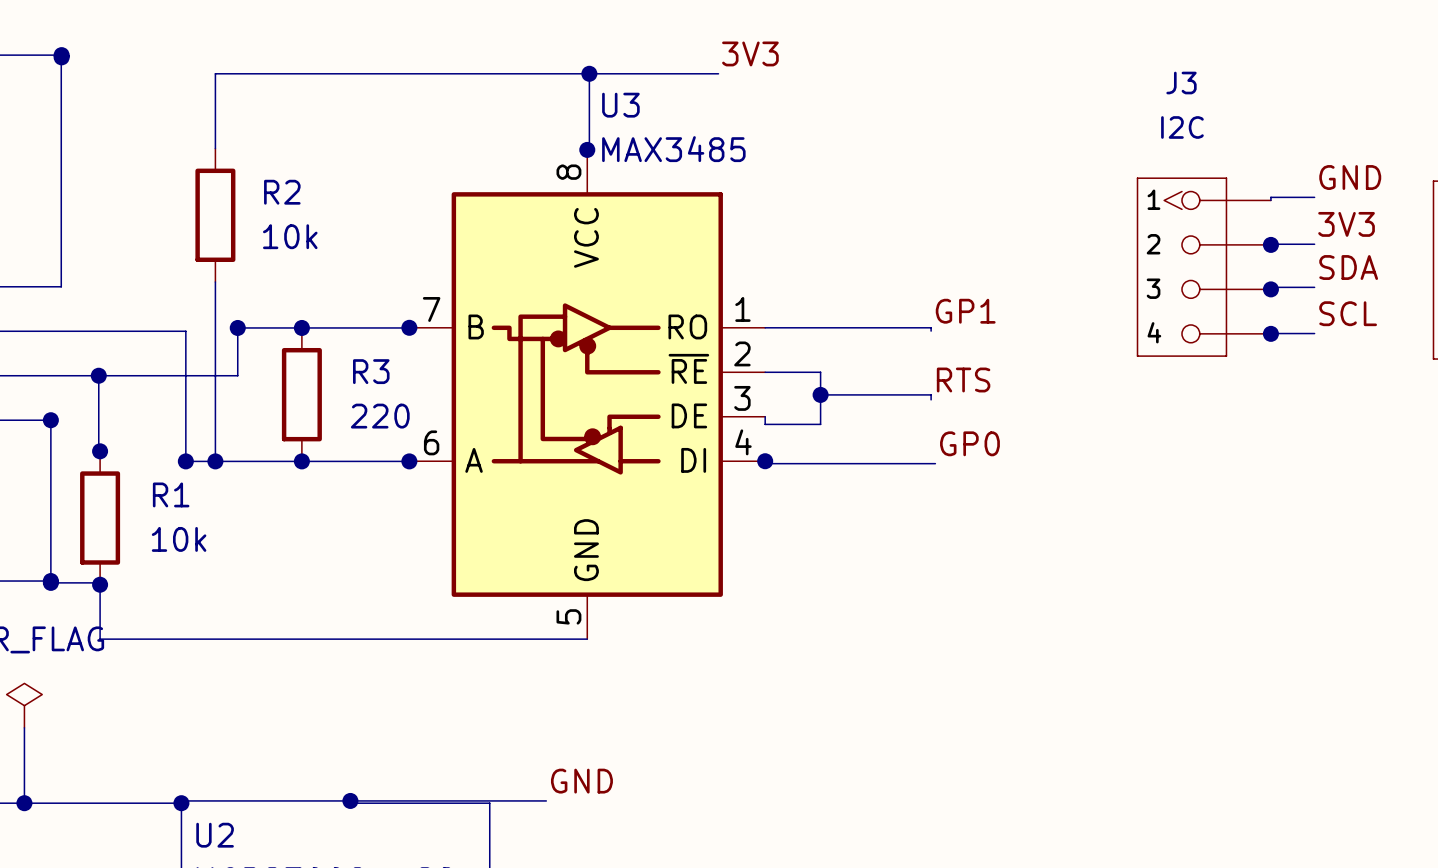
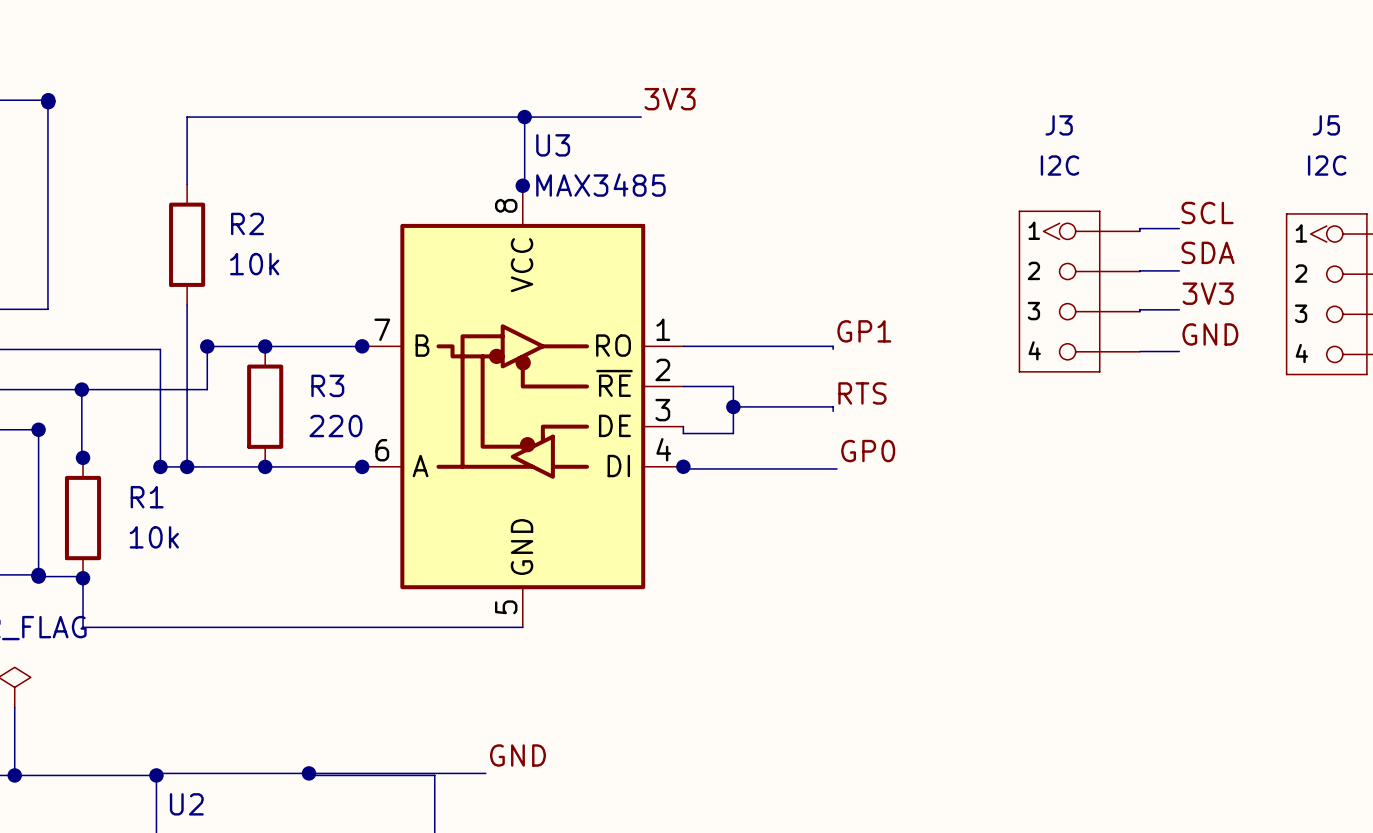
label: GND (1350, 177) -> SCL (1207, 212)
label: 3V3 (1346, 224) -> SDA (1208, 252)
junction: (1270, 244) -> none
label: SDA (1348, 267) -> 3V3 (1208, 293)
junction: (1270, 289) -> none
label: SCL (1348, 313) -> GND (1210, 334)
junction: (1270, 333) -> none

